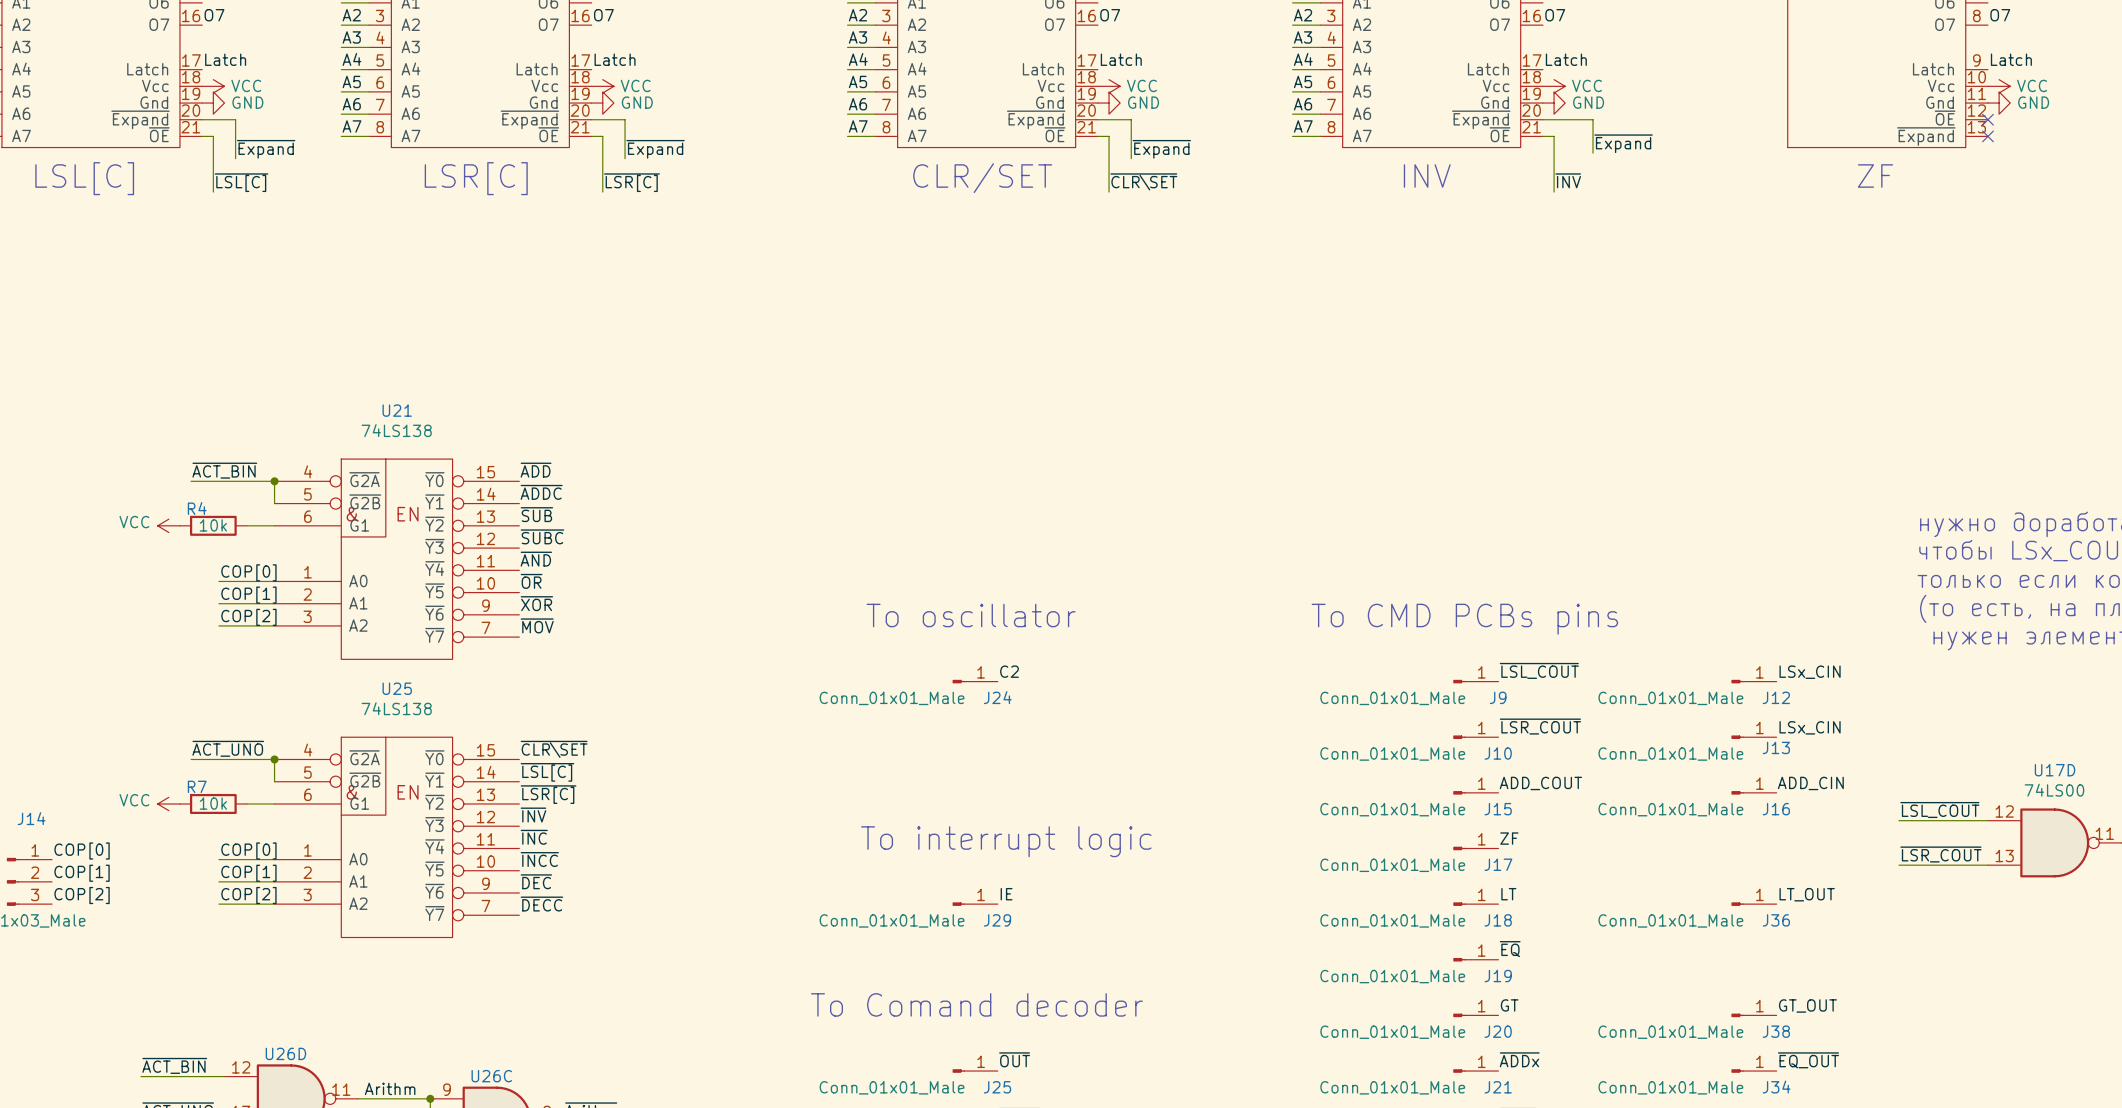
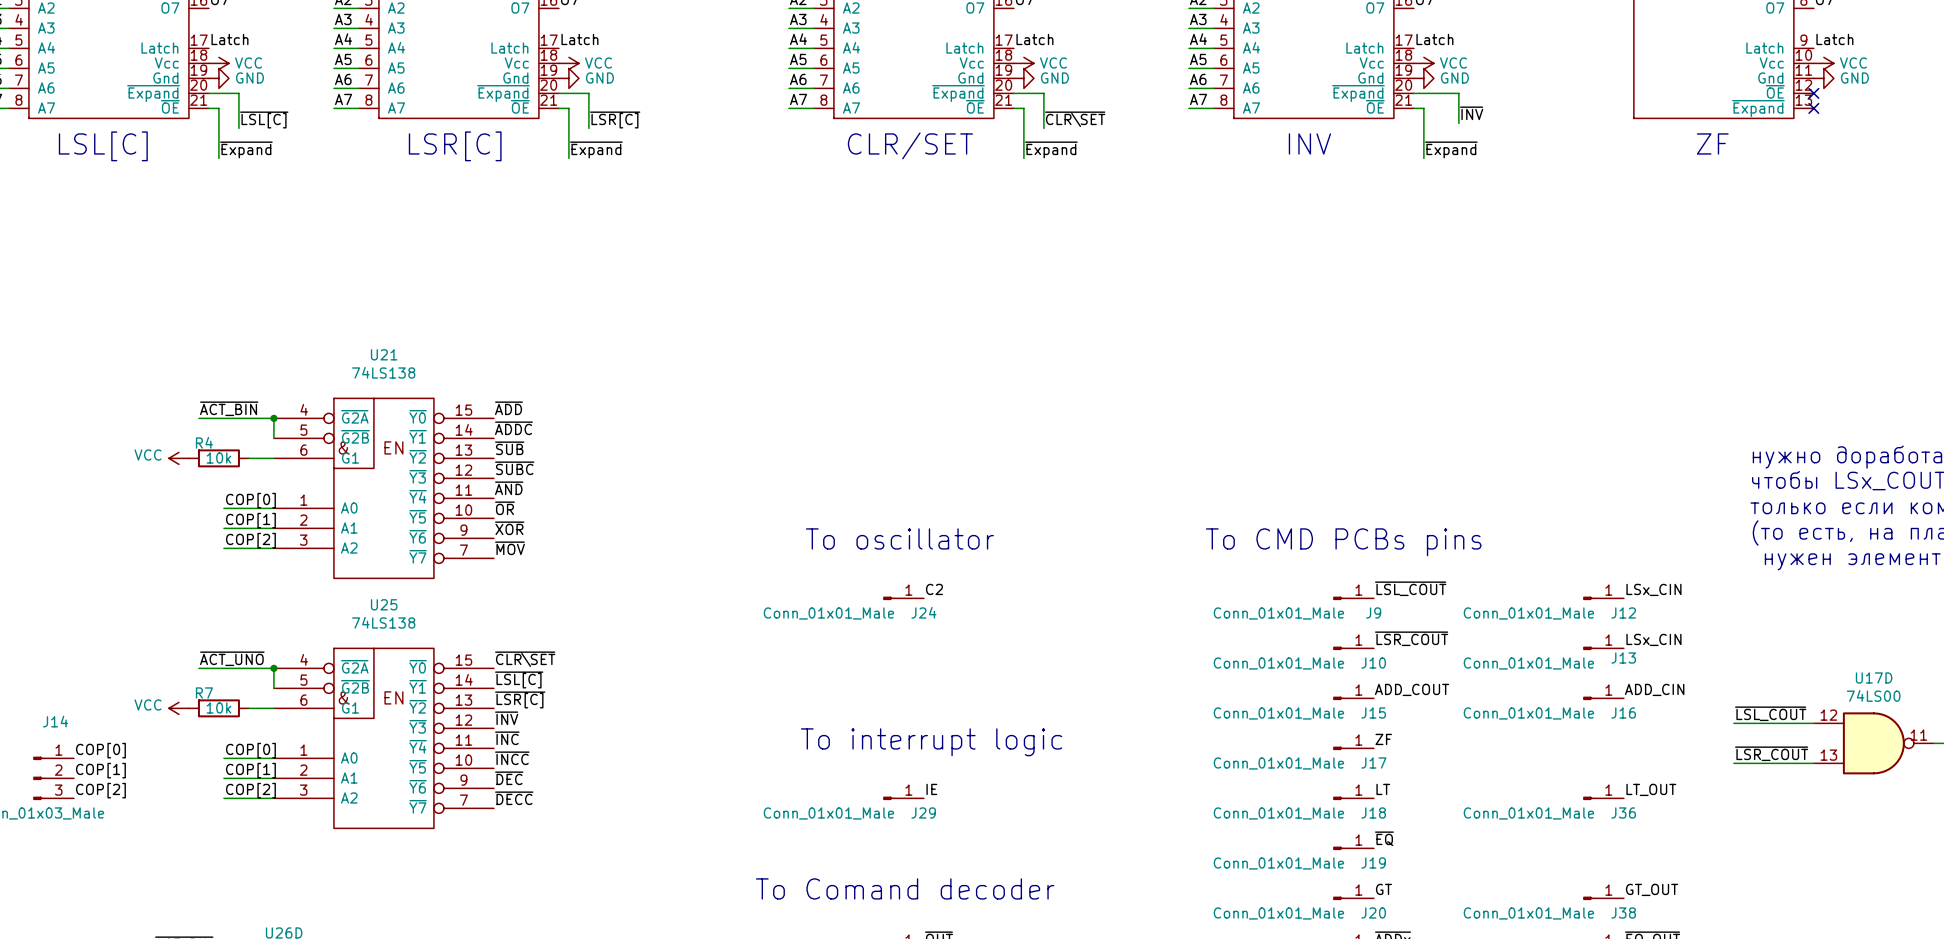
label: ~{Expand} (1623, 143) -> ~{INV} (1471, 113)
label: ~{Expand} (266, 149) -> ~{LSL[C]} (264, 119)
label: ~{Expand} (655, 149) -> ~{LSR[C]} (615, 119)
label: ~{Expand} (1161, 149) -> ~{CLR\SET} (1075, 119)
label: ~{INV} (1568, 180) -> ~{Expand} (1451, 149)
label: ~{CLR\SET} (1143, 181) -> ~{Expand} (1051, 149)
label: ~{LSL[C]} (241, 182) -> ~{Expand} (246, 149)
label: ~{LSR[C]} (631, 182) -> ~{Expand} (596, 149)

